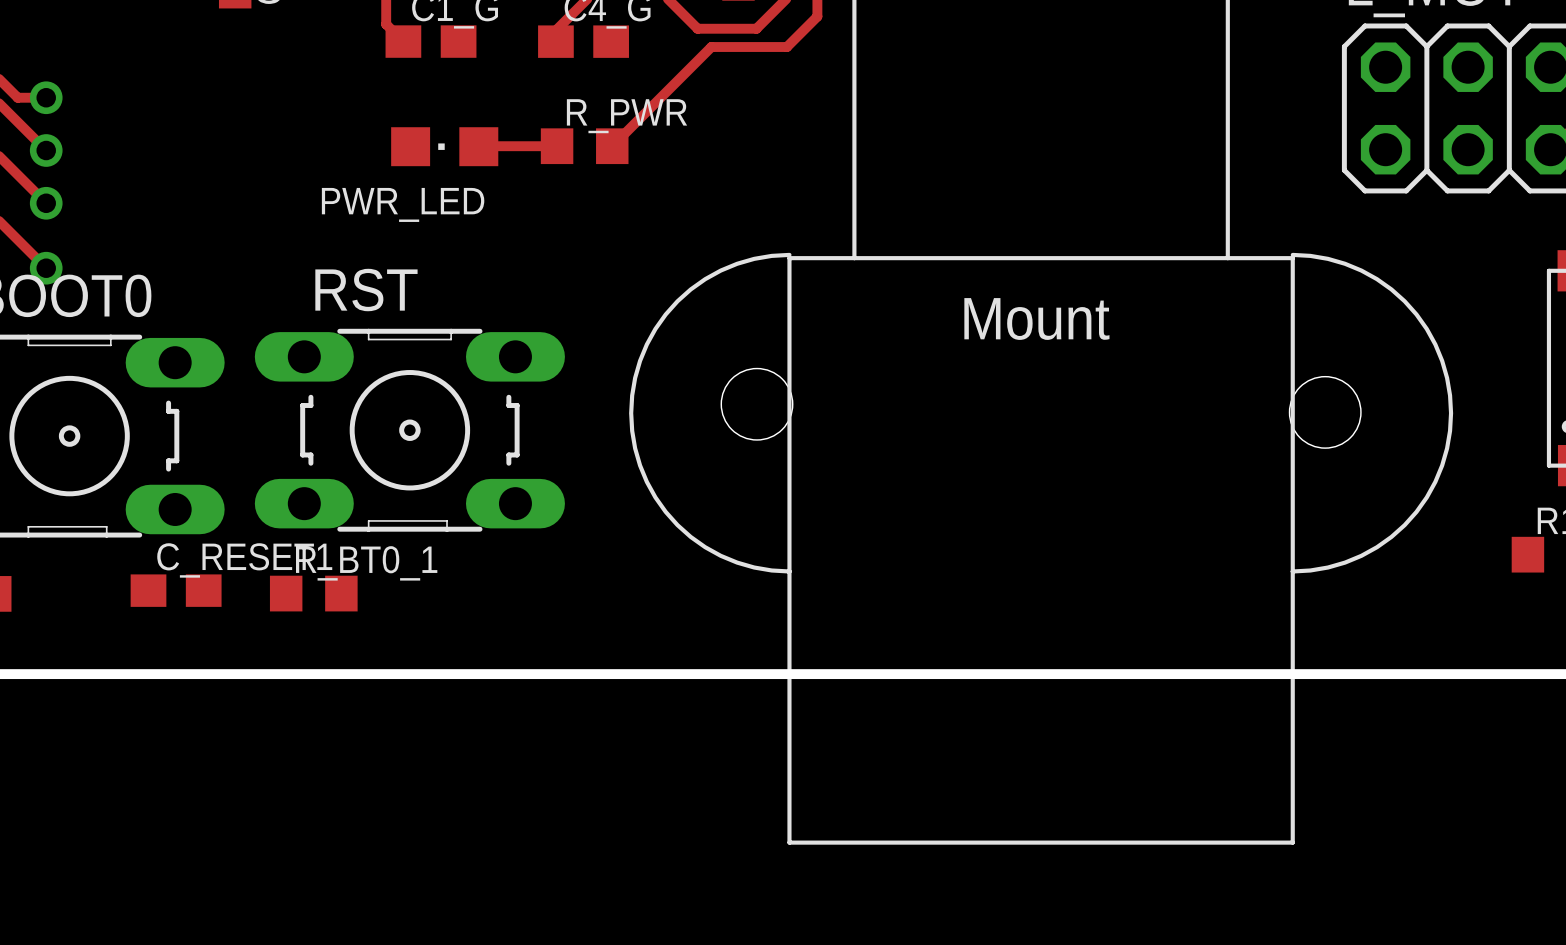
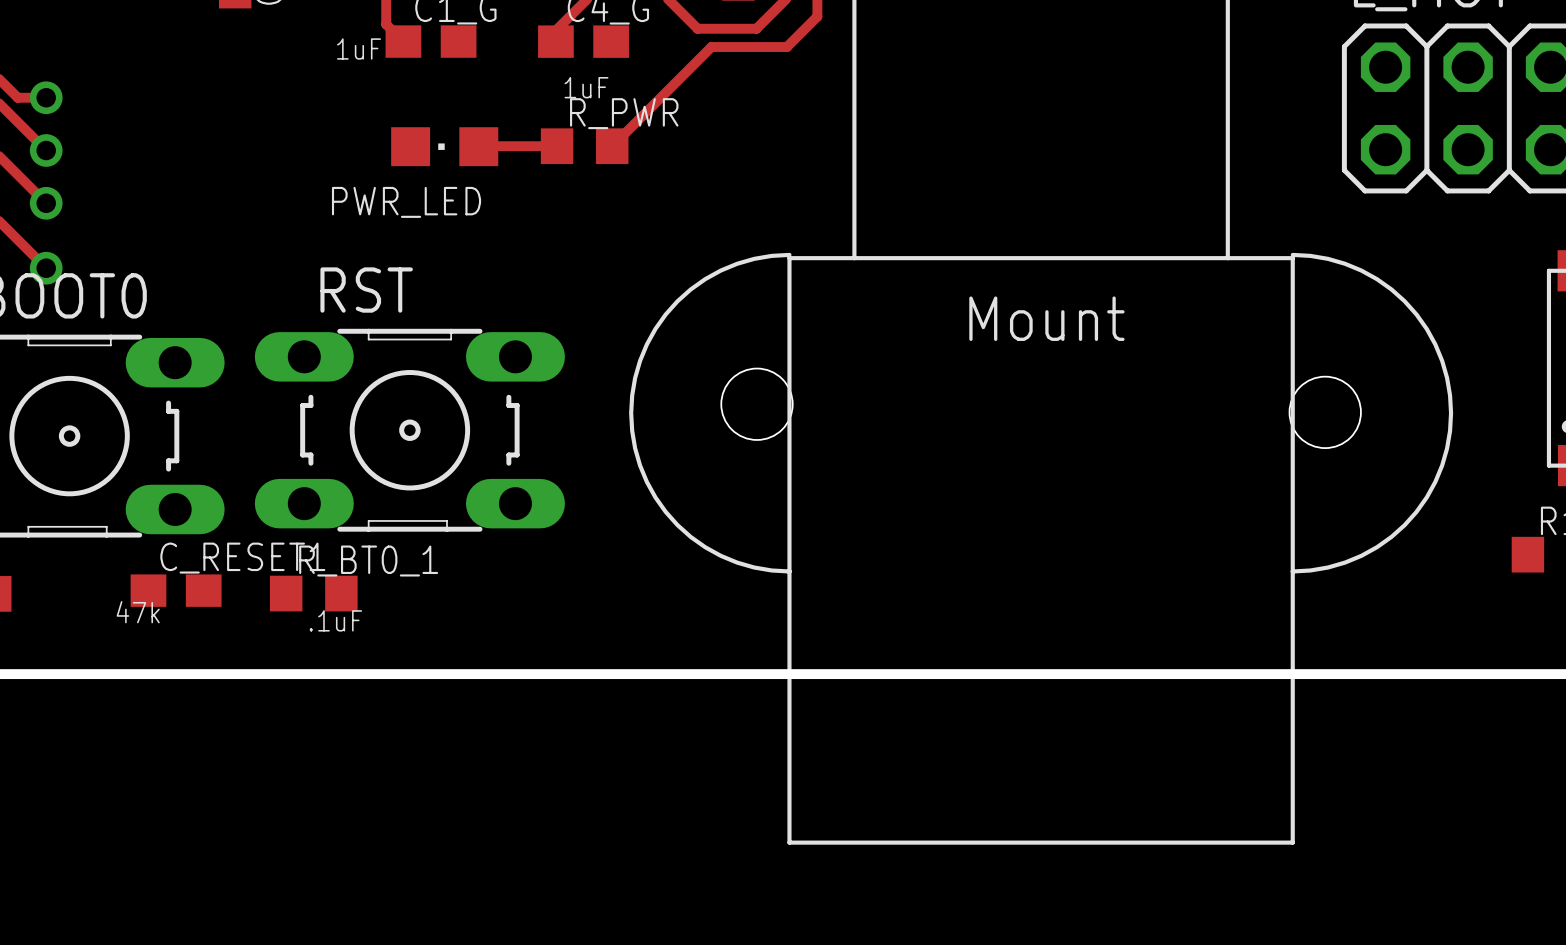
text: none -> 1uF (358, 48)
text: none -> 1uF (586, 87)
text: none -> 47k (138, 612)
text: none -> .1uF (335, 620)

